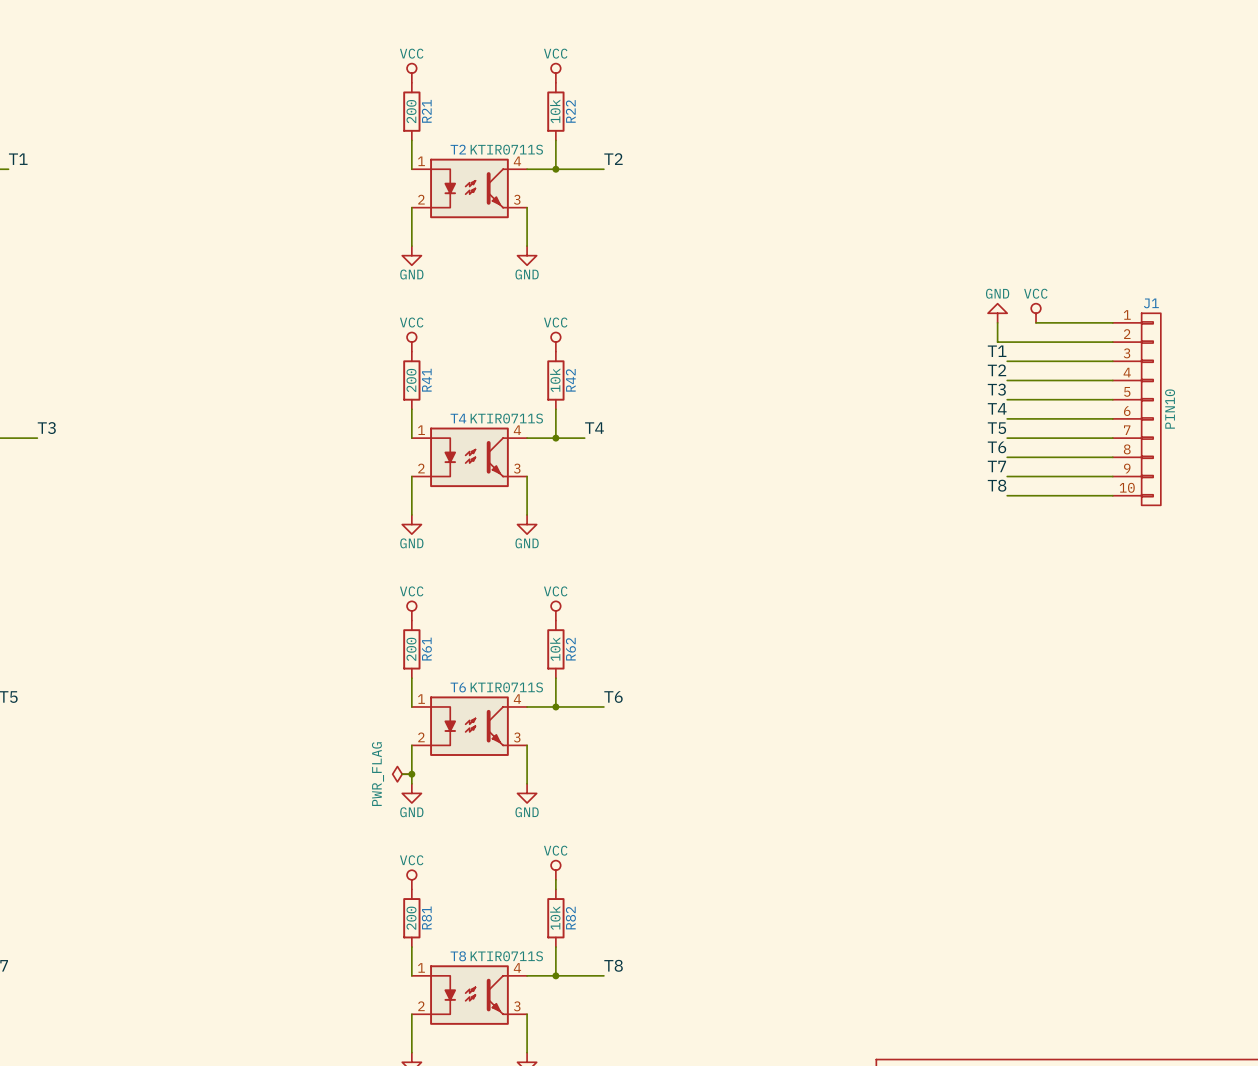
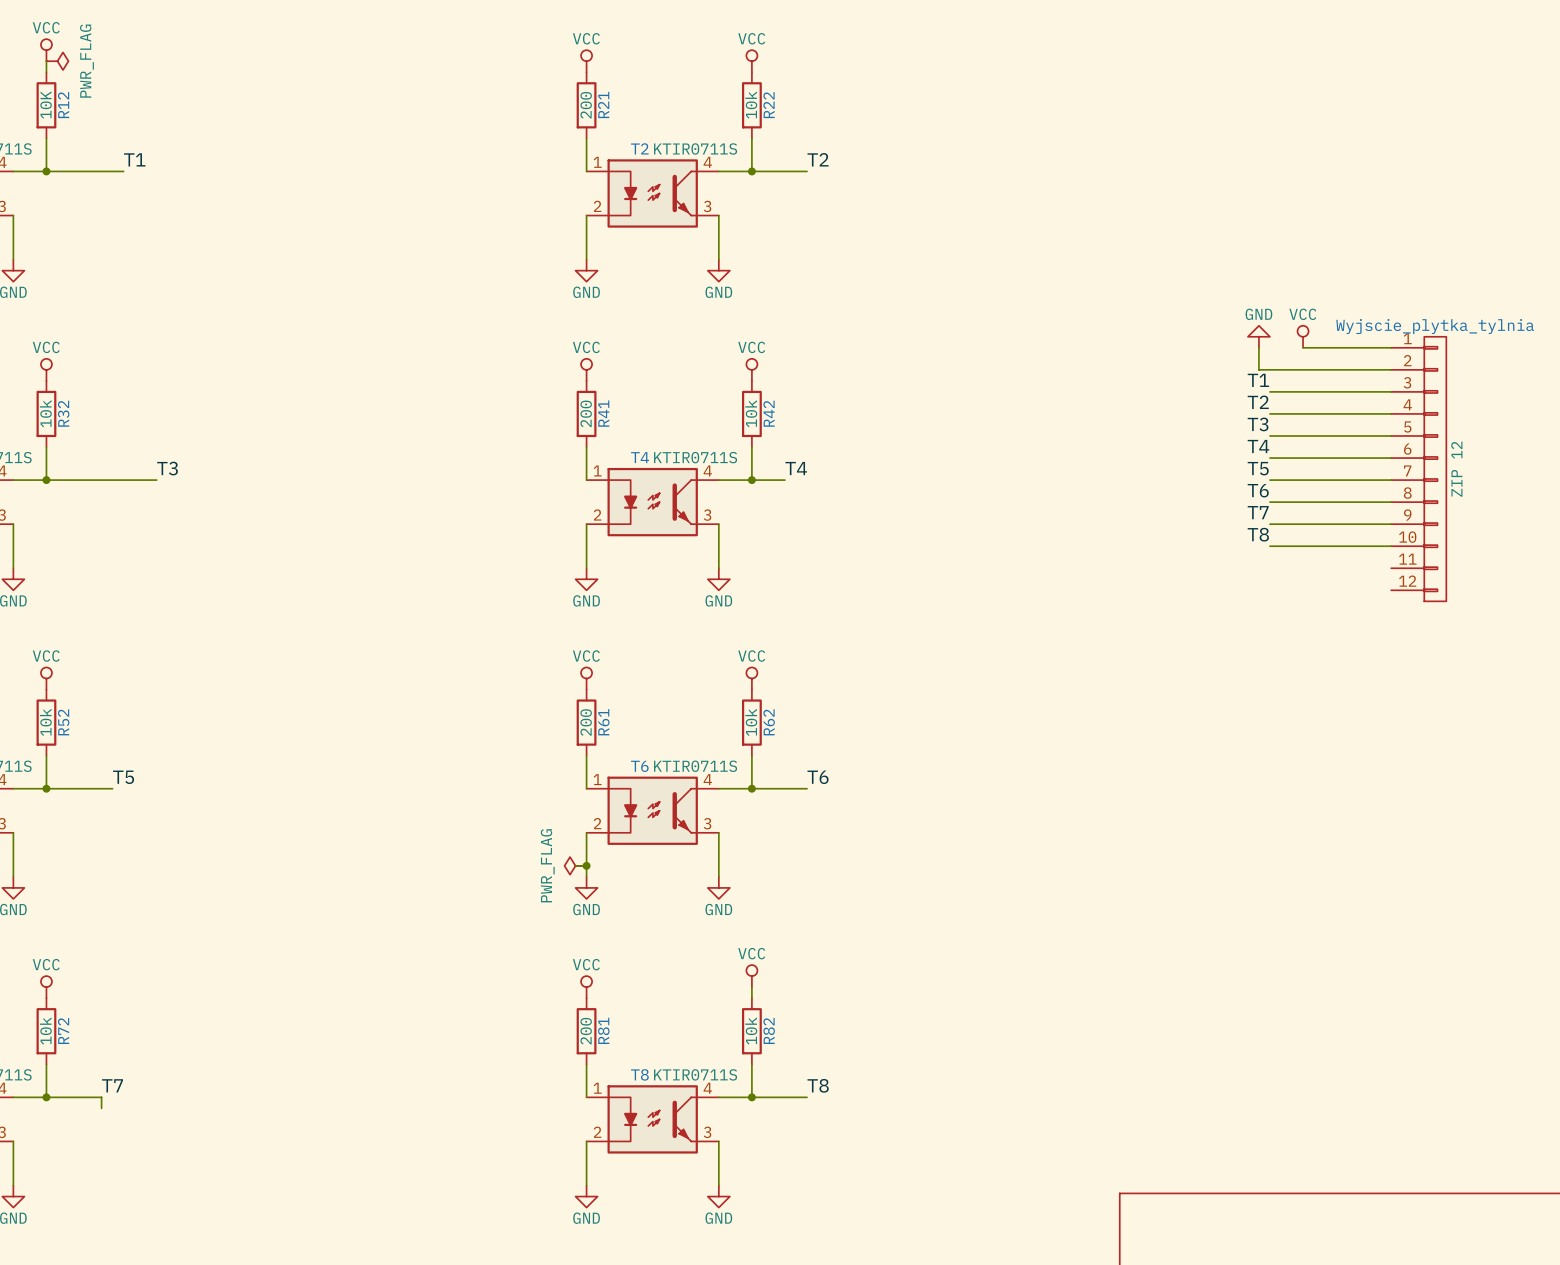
J1: PIN10 (1136, 409) -> none
Wyjscie_plytka_tylnia: none -> ZIP 12 (1418, 469)

